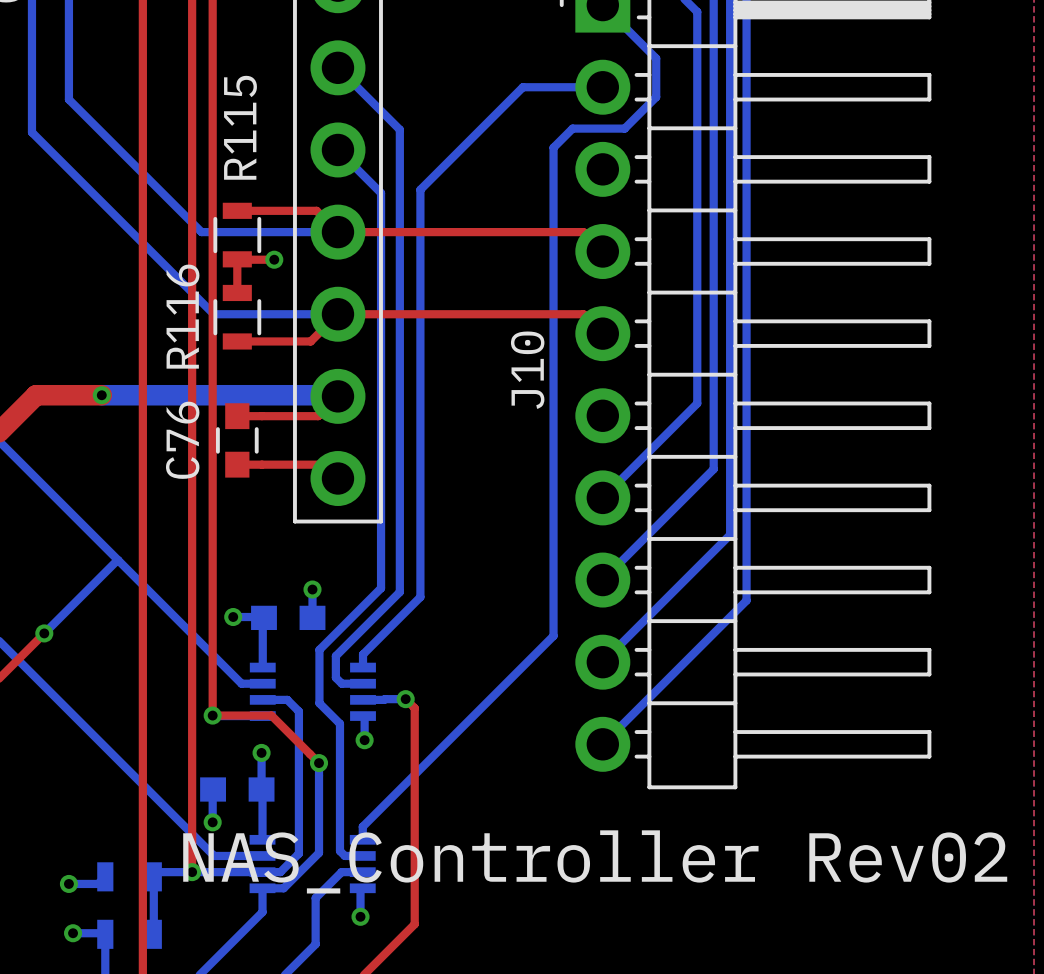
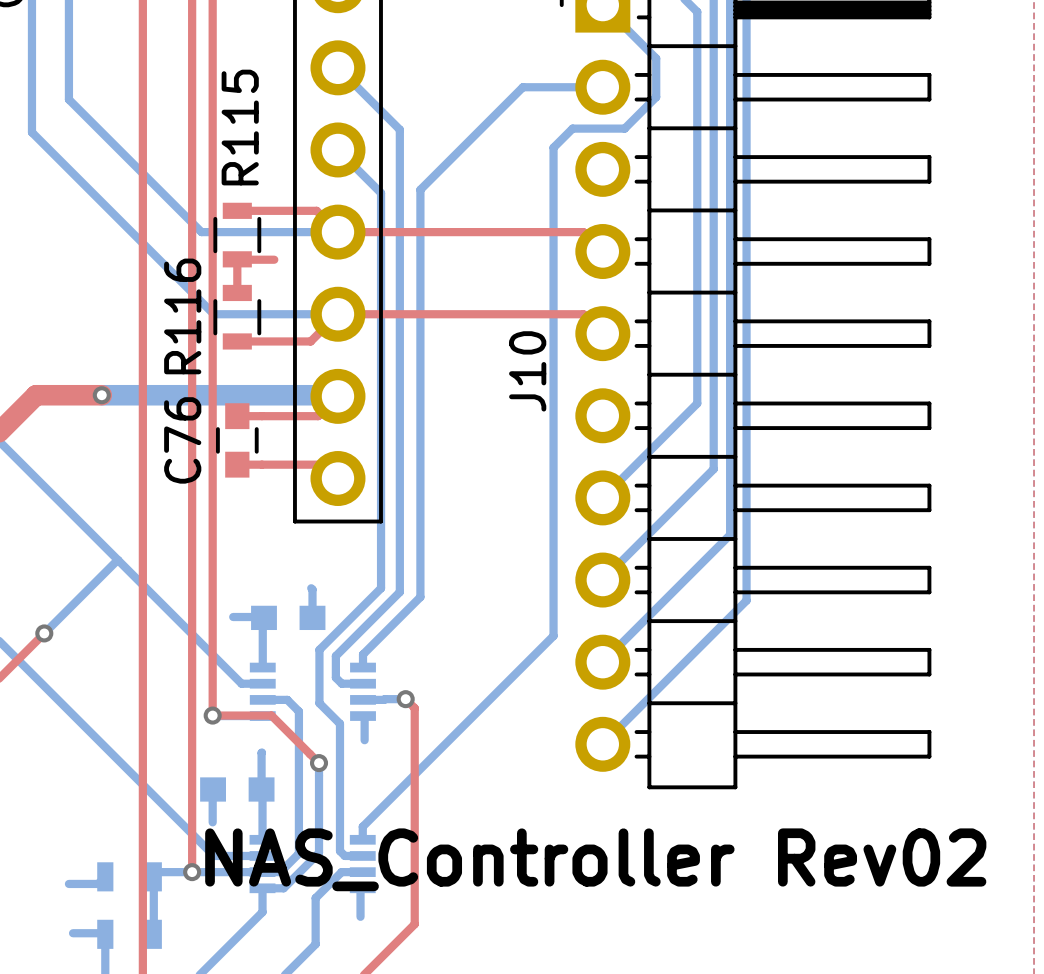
via: (274, 259) -> none
via: (312, 589) -> none
via: (233, 617) -> none
via: (364, 740) -> none
via: (261, 752) -> none
via: (212, 822) -> none
via: (68, 883) -> none
via: (360, 916) -> none
via: (73, 933) -> none

